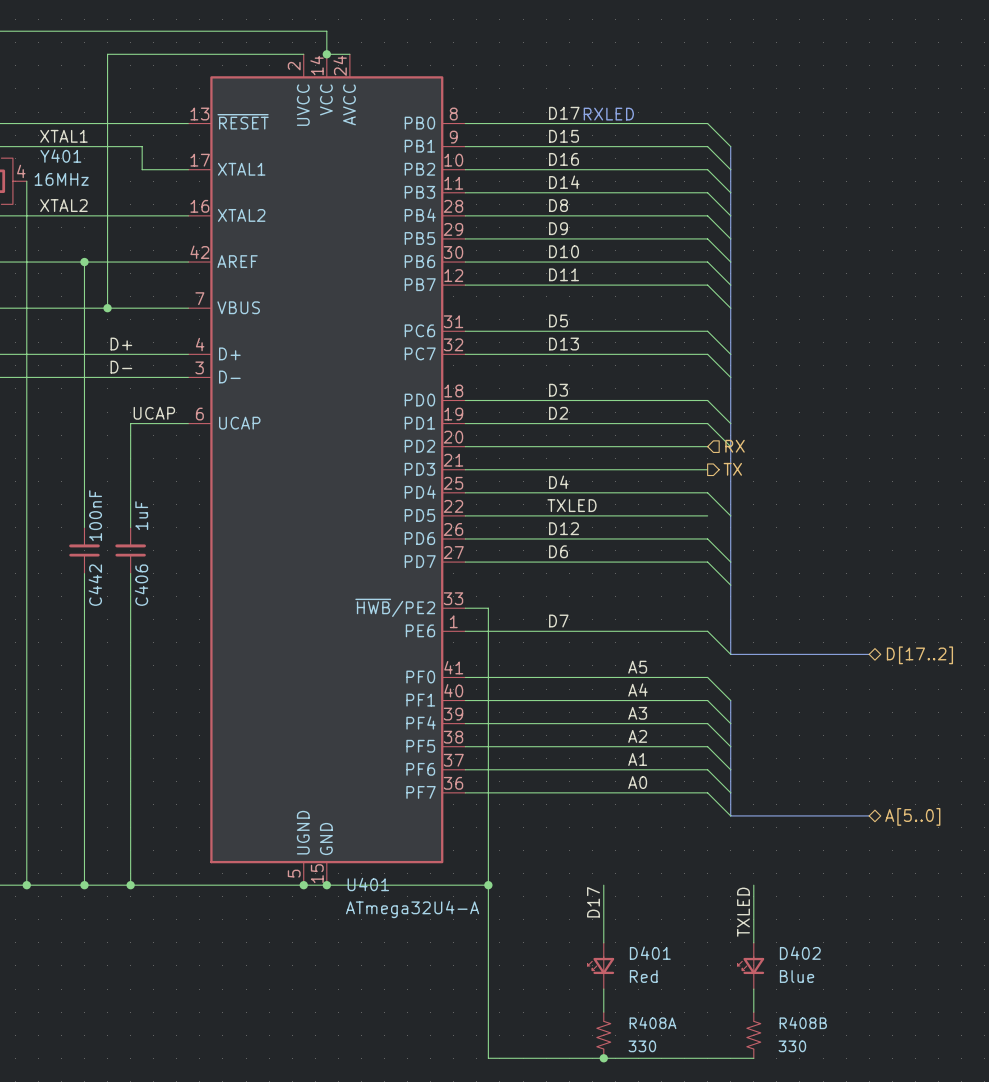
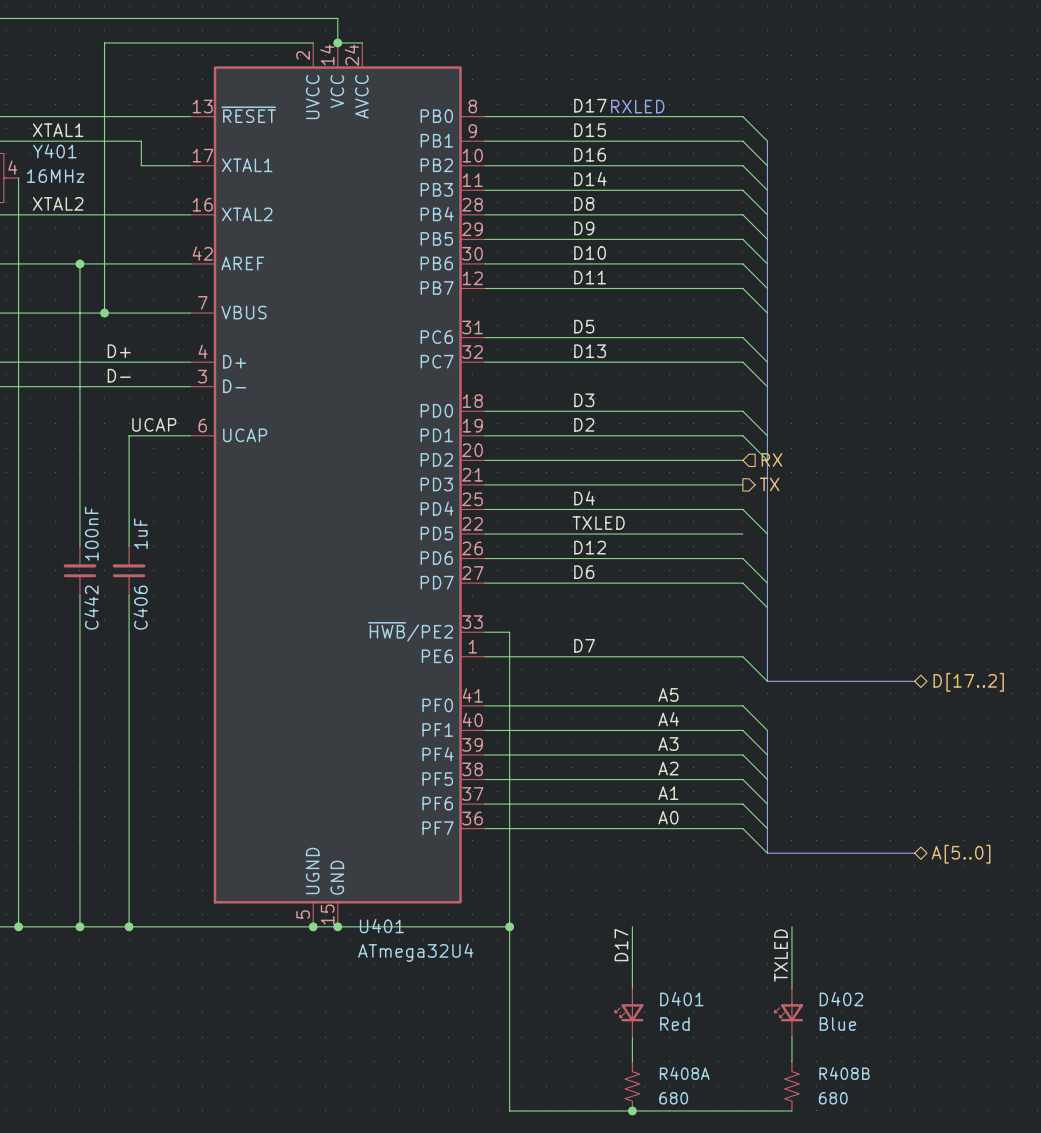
U401 value: ATmega32U4-A (412, 909) -> ATmega32U4 (415, 952)
R408A value: 330 (642, 1046) -> 680 (673, 1098)
R408B value: 330 (792, 1046) -> 680 (833, 1098)

